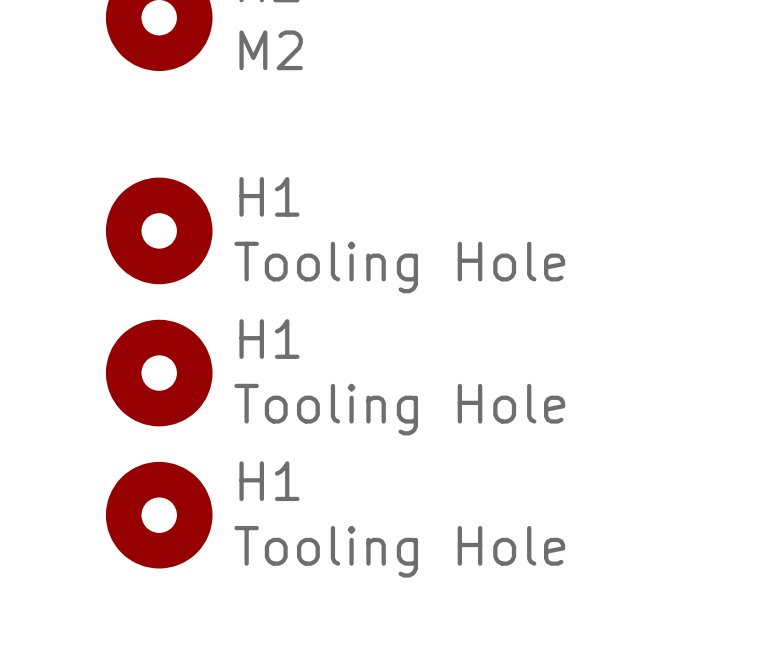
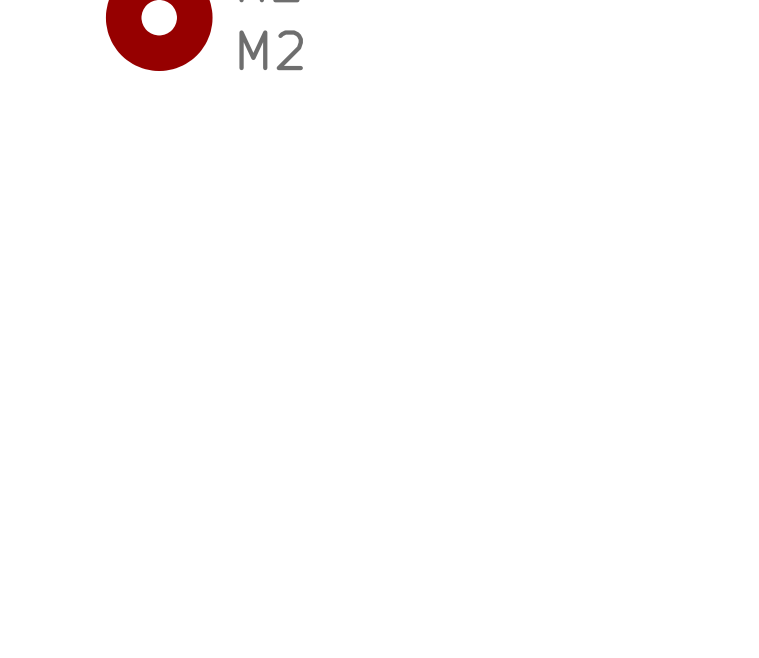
H1: Tooling Hole (159, 230) -> none
H1: Tooling Hole (159, 373) -> none
H1: Tooling Hole (159, 515) -> none

